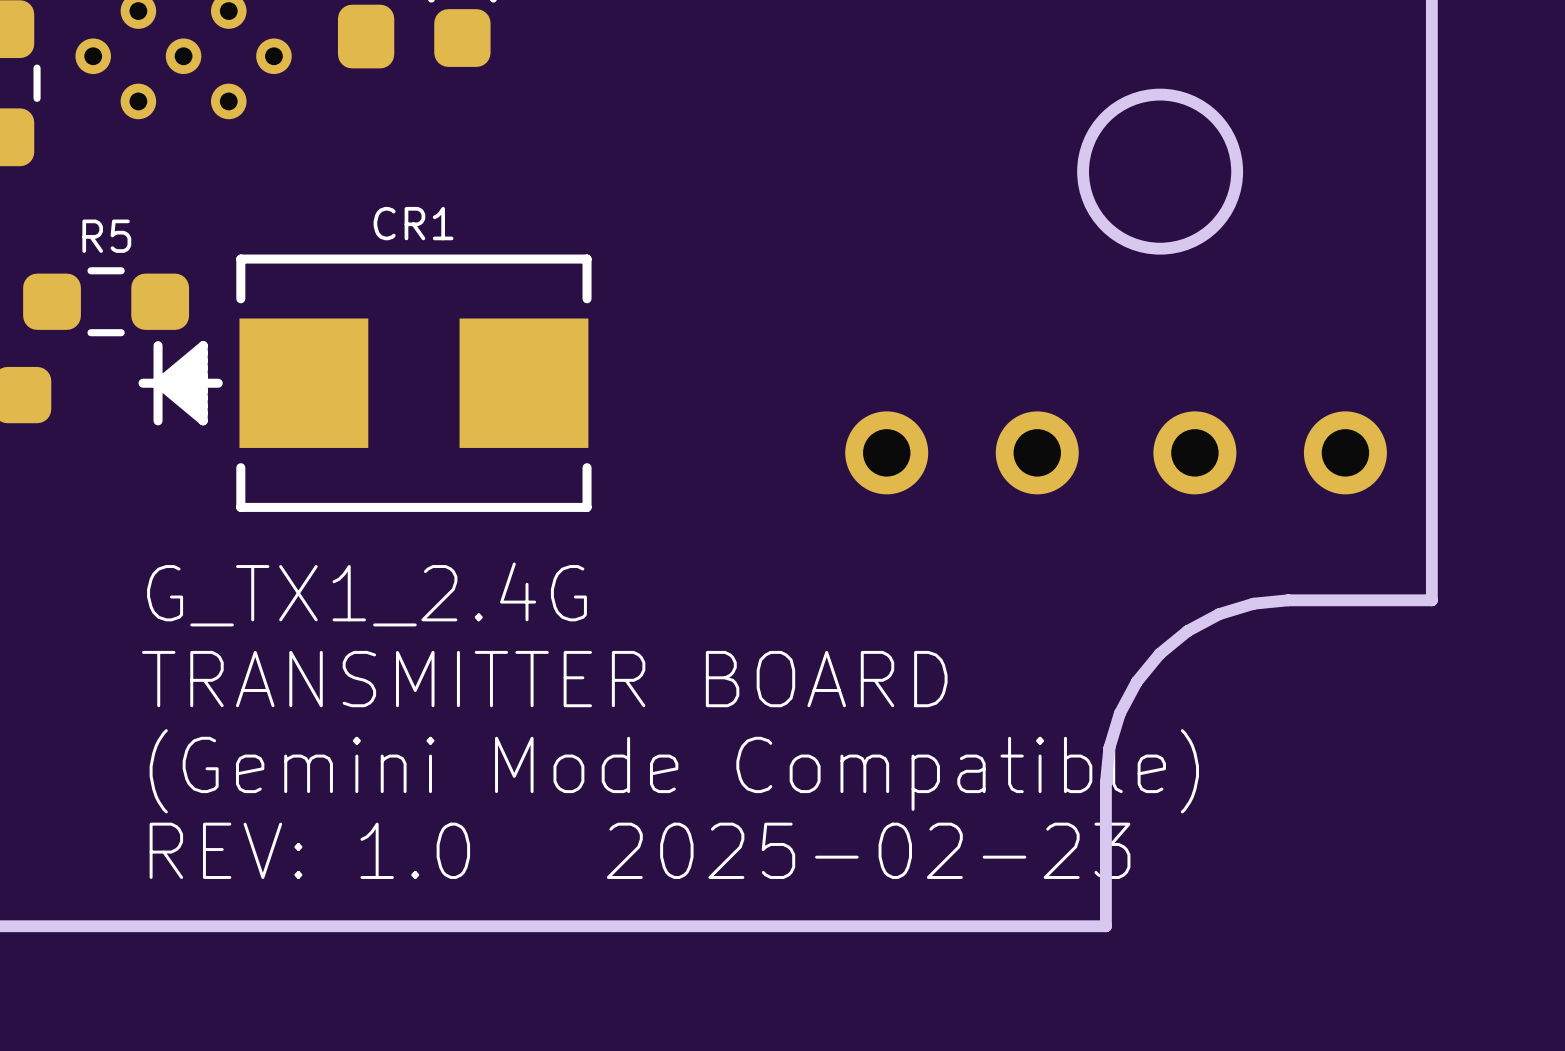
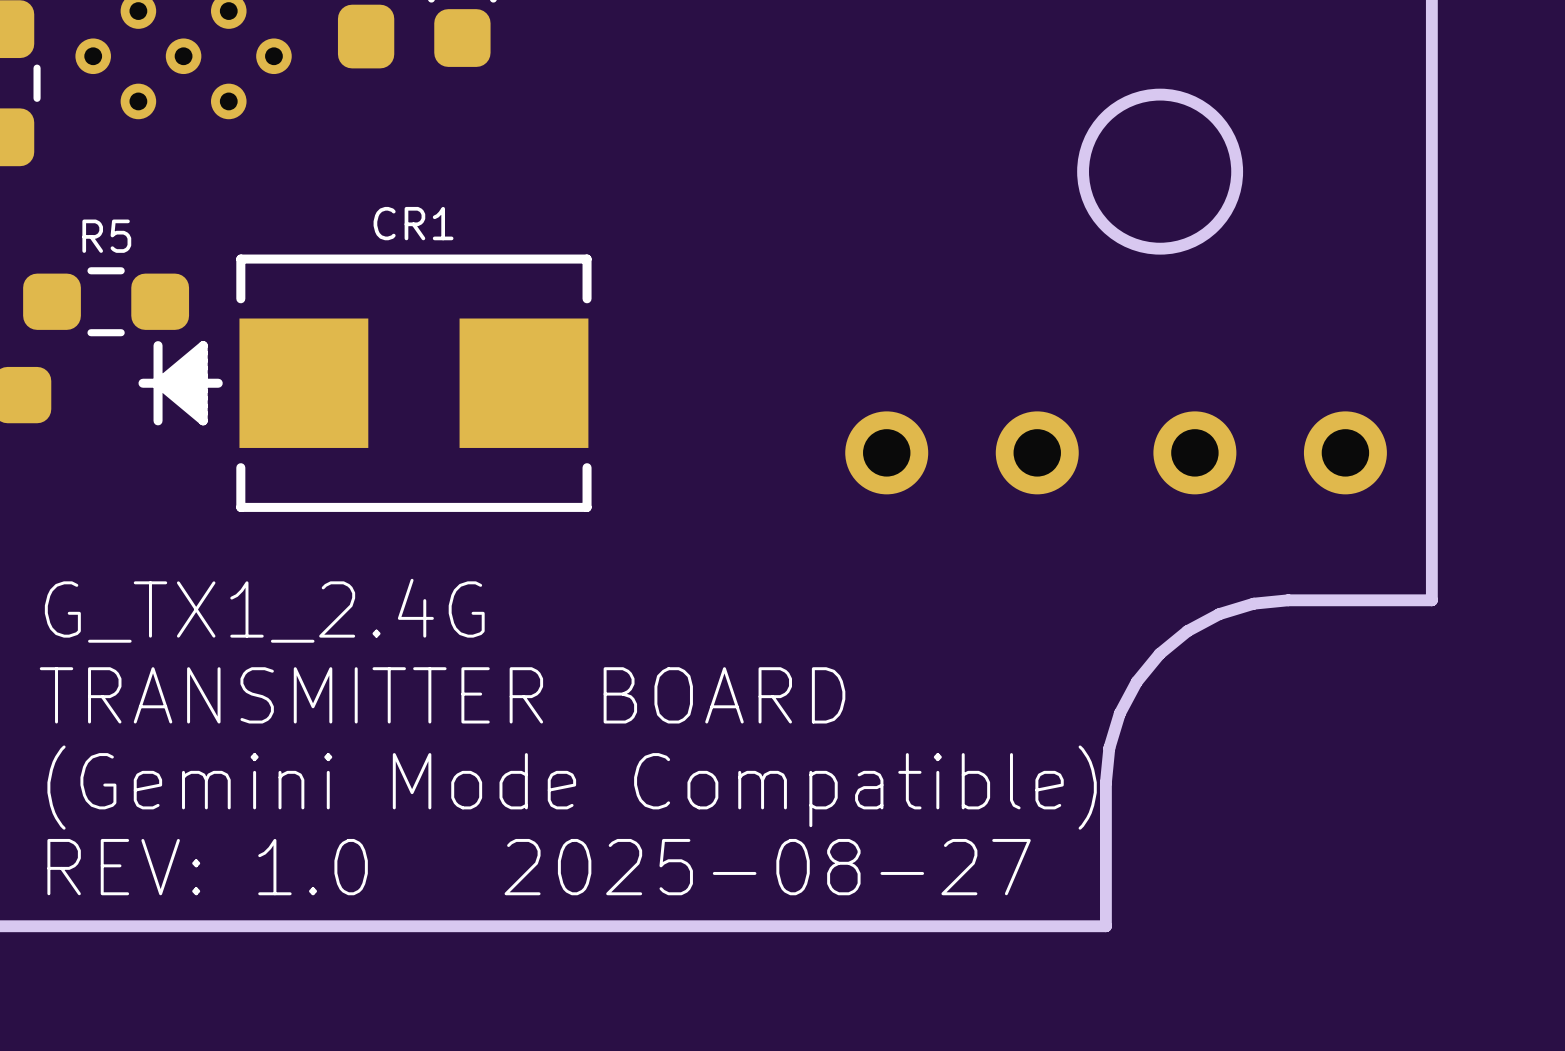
text position: G_TX1_2.4G (367, 594) -> G_TX1_2.4G (264, 610)
text position: TRANSMITTER BOARD (544, 679) -> TRANSMITTER BOARD (442, 695)
text position: (Gemini Mode Compatible) (674, 771) -> (Gemini Mode Compatible) (572, 787)
text: REV: 1.0 2025-02-23 (640, 850) -> REV: 1.0 2025-08-27 (539, 867)

